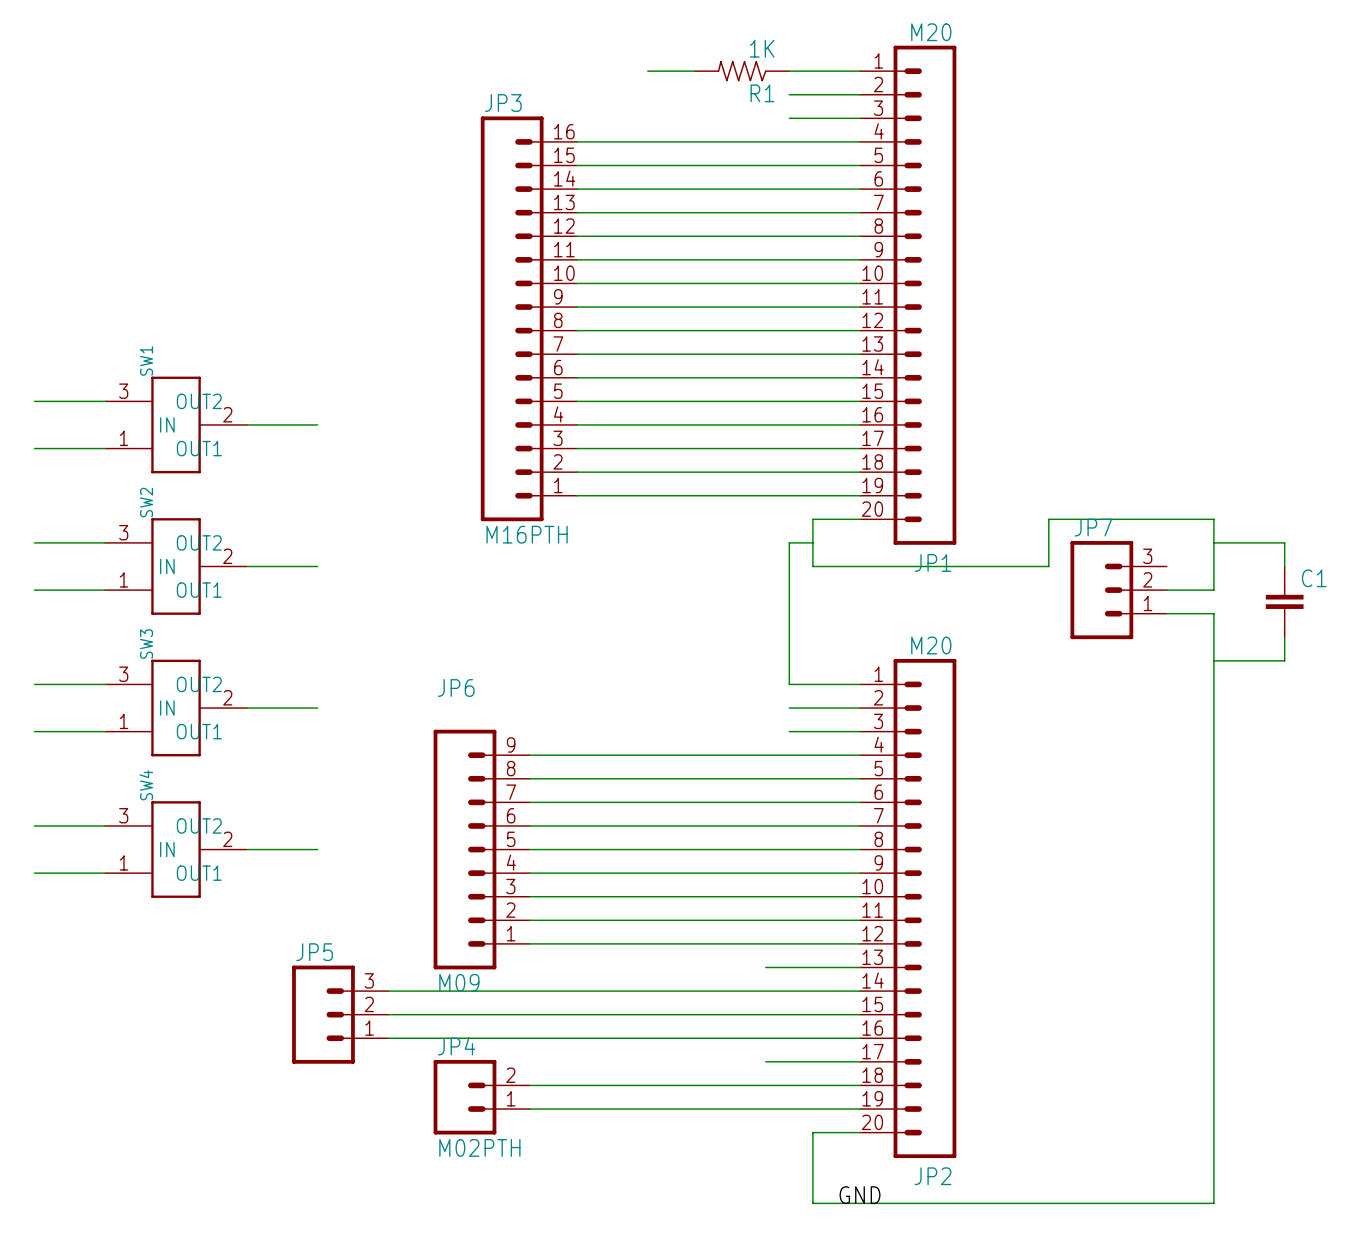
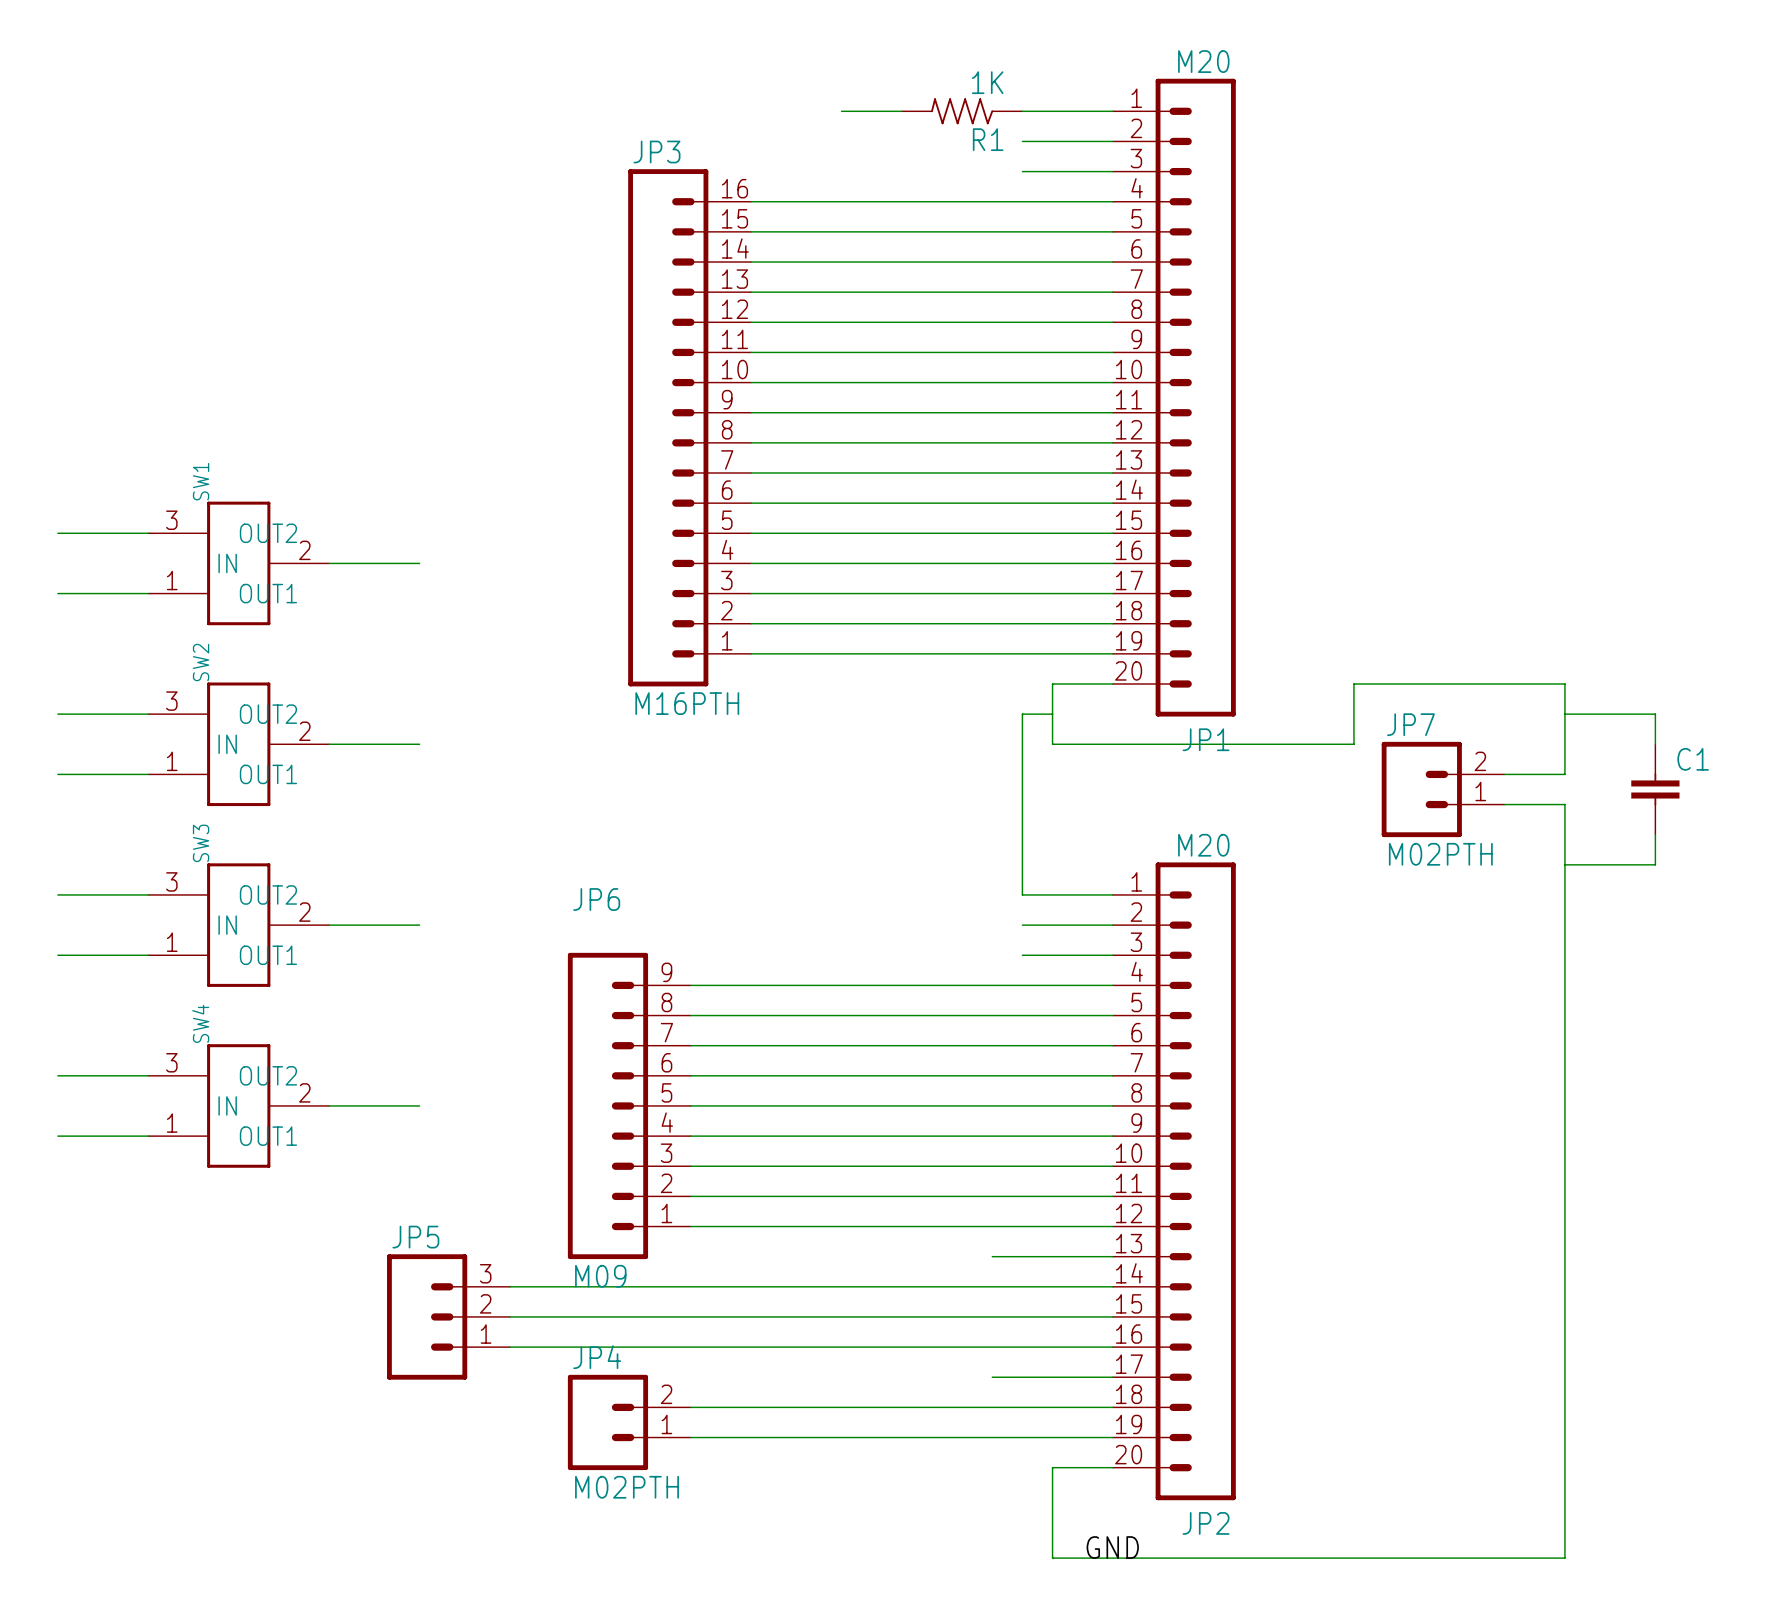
JP7 symbol: [1070, 541, 1167, 640] -> [1381, 741, 1505, 838]
JP7 value: none -> M02PTH (1440, 854)

